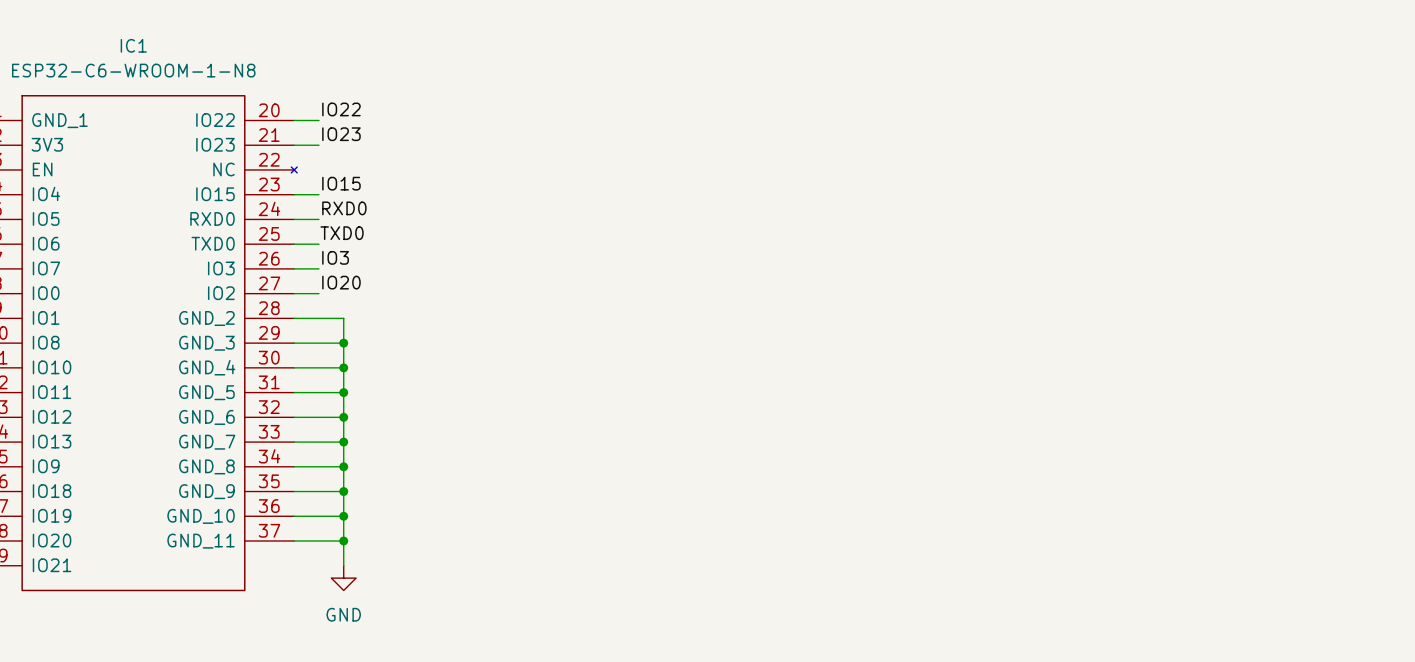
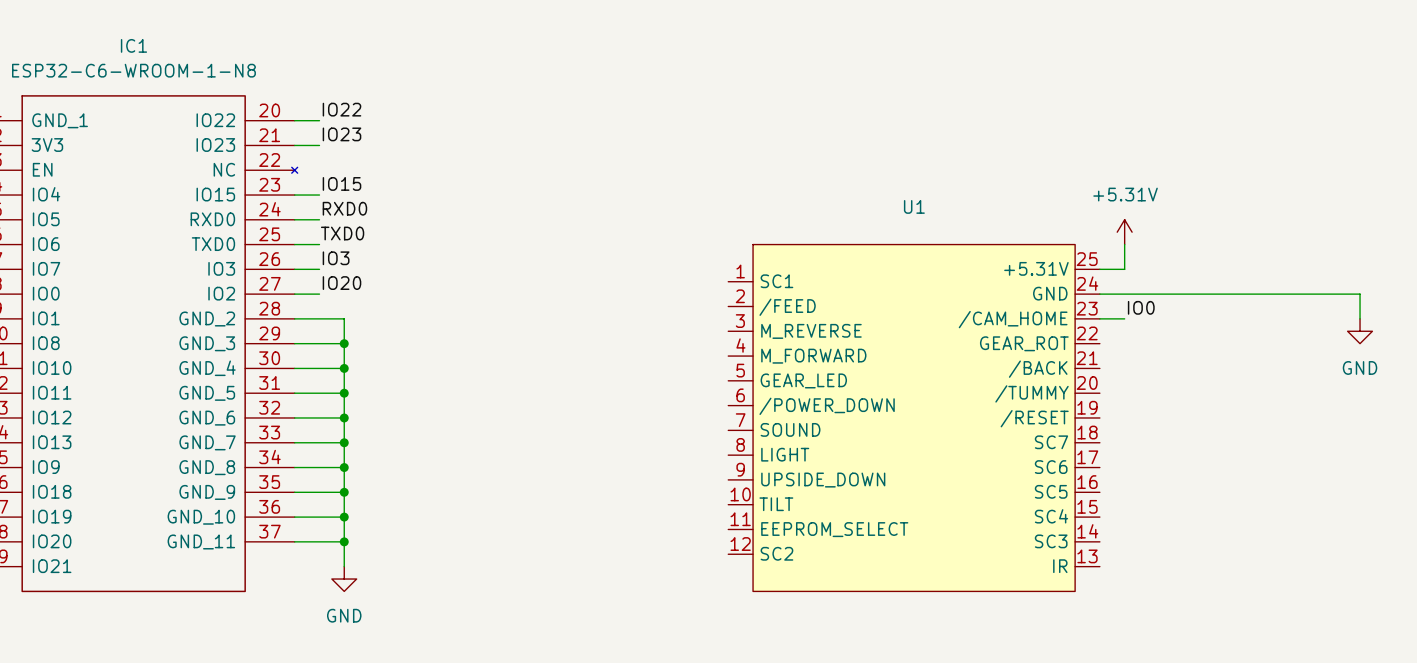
power symbol: none -> +5.31V (1124, 232)
wire: none -> (1124, 244) (1124, 269) (1099, 269)
wire: none -> (1099, 294) (1360, 294) (1360, 318)
label: none -> IO0 (1141, 307)
wire: none -> (1099, 318) (1124, 318)
power symbol: none -> GND (1360, 331)
U1: none -> (914, 417)

